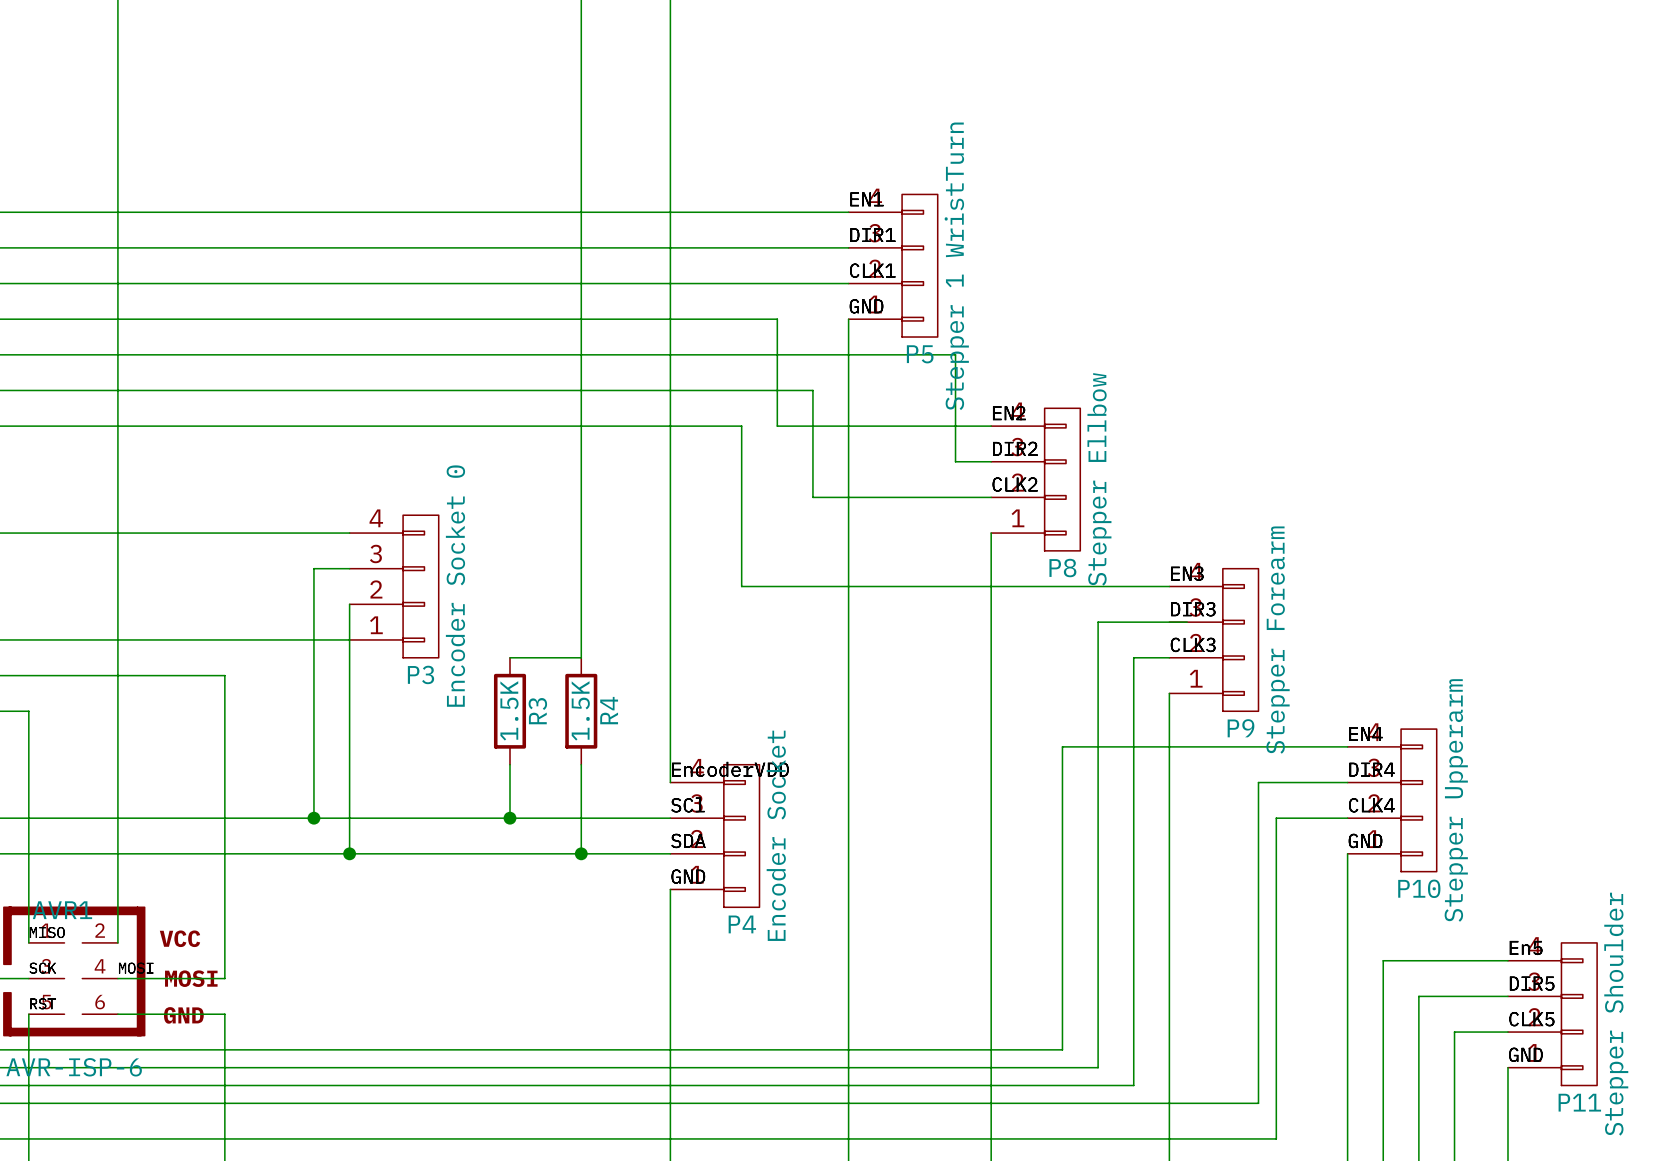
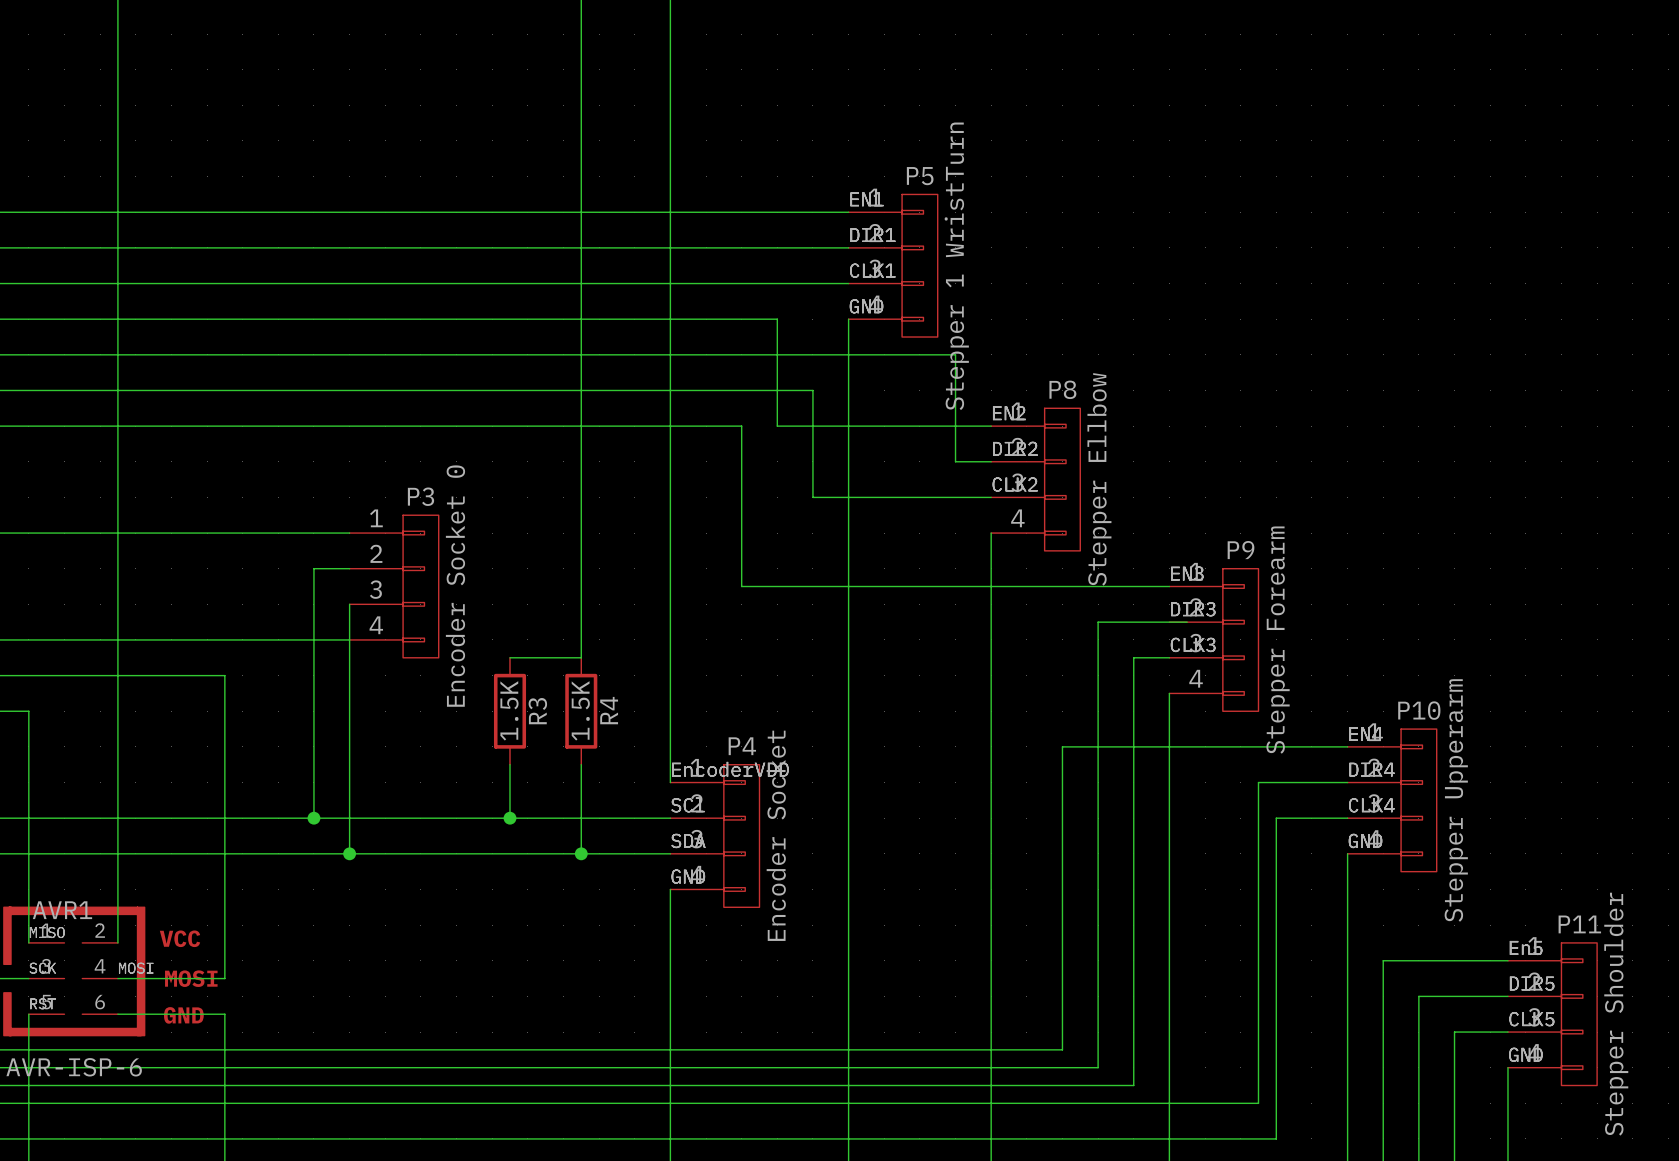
P5 flip: as is (919, 265) -> up-down (919, 265)
P8 flip: as is (1062, 479) -> up-down (1062, 479)
P3 flip: as is (420, 586) -> up-down (420, 586)
P9 flip: as is (1240, 639) -> up-down (1240, 639)
P10 flip: as is (1418, 800) -> up-down (1418, 800)
P4 flip: as is (741, 836) -> up-down (741, 836)
P11 flip: as is (1579, 1014) -> up-down (1579, 1014)

